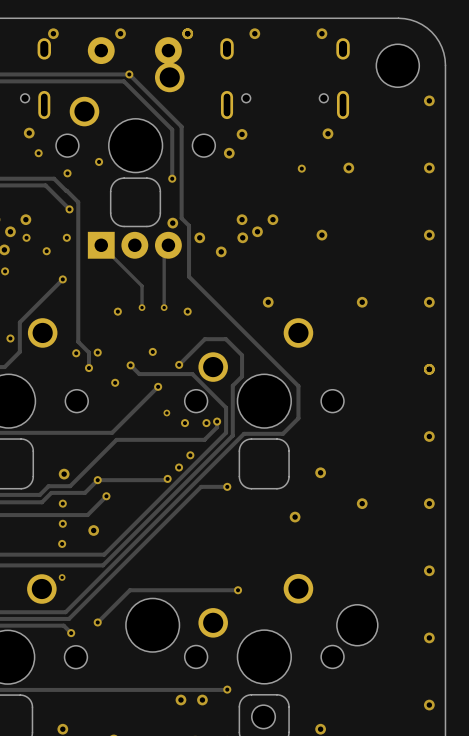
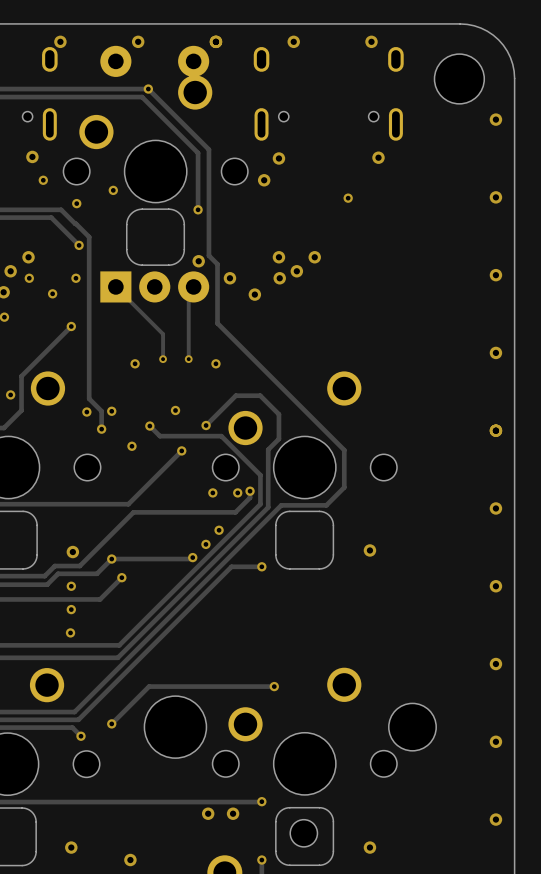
via: (348, 167) -> none
via: (321, 235) -> none
via: (268, 302) -> none
via: (362, 302) -> none
via: (166, 413) -> none
via: (362, 503) -> none
via: (295, 517) -> none
via: (93, 530) -> none
via: (62, 577) -> none

